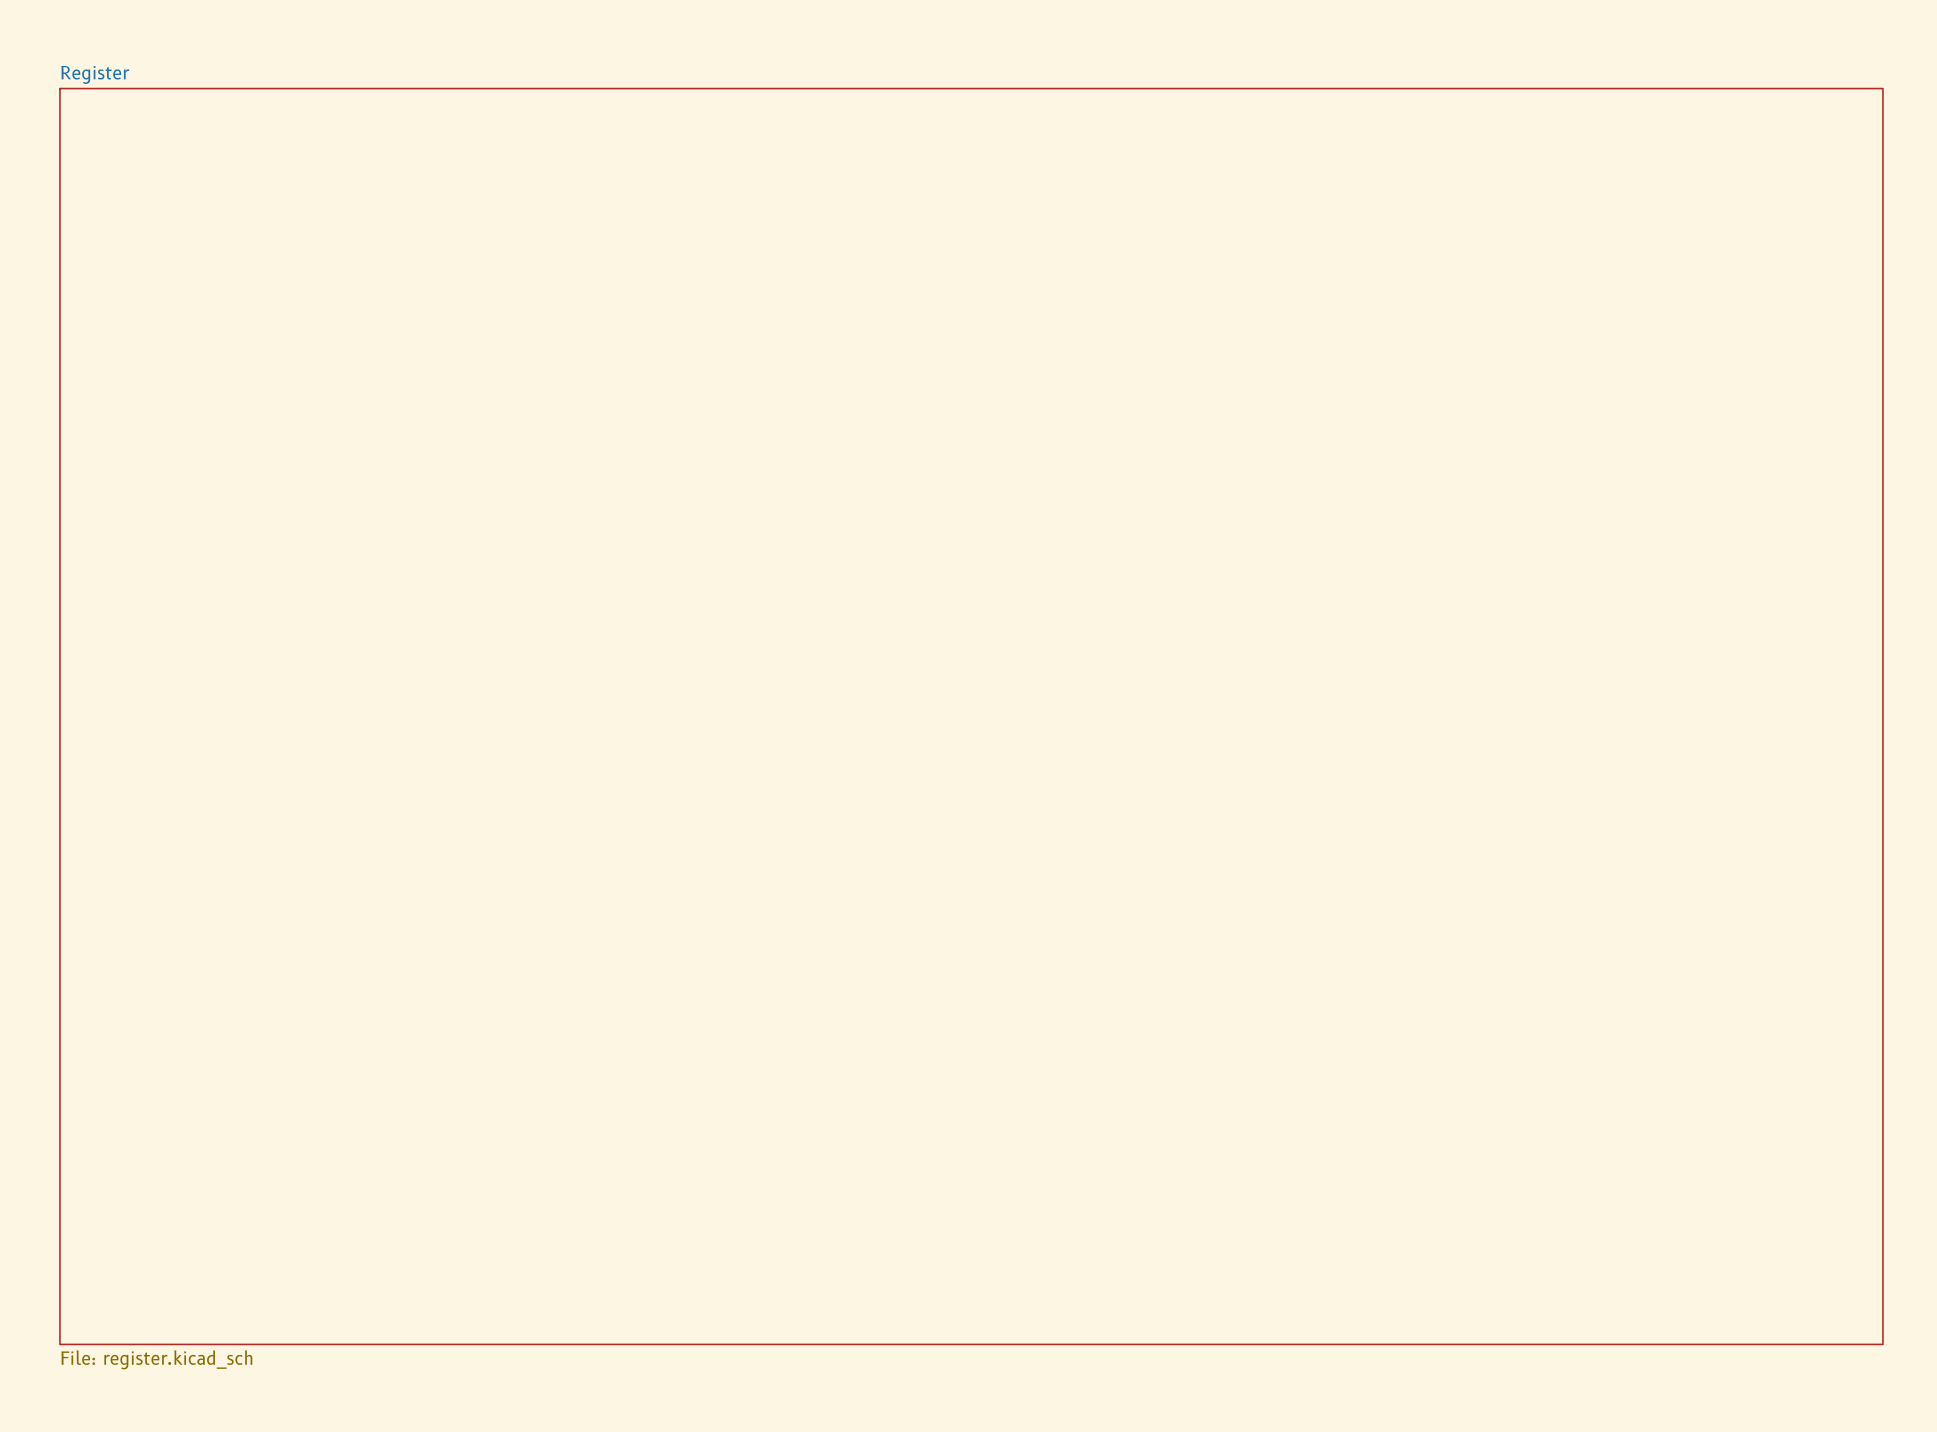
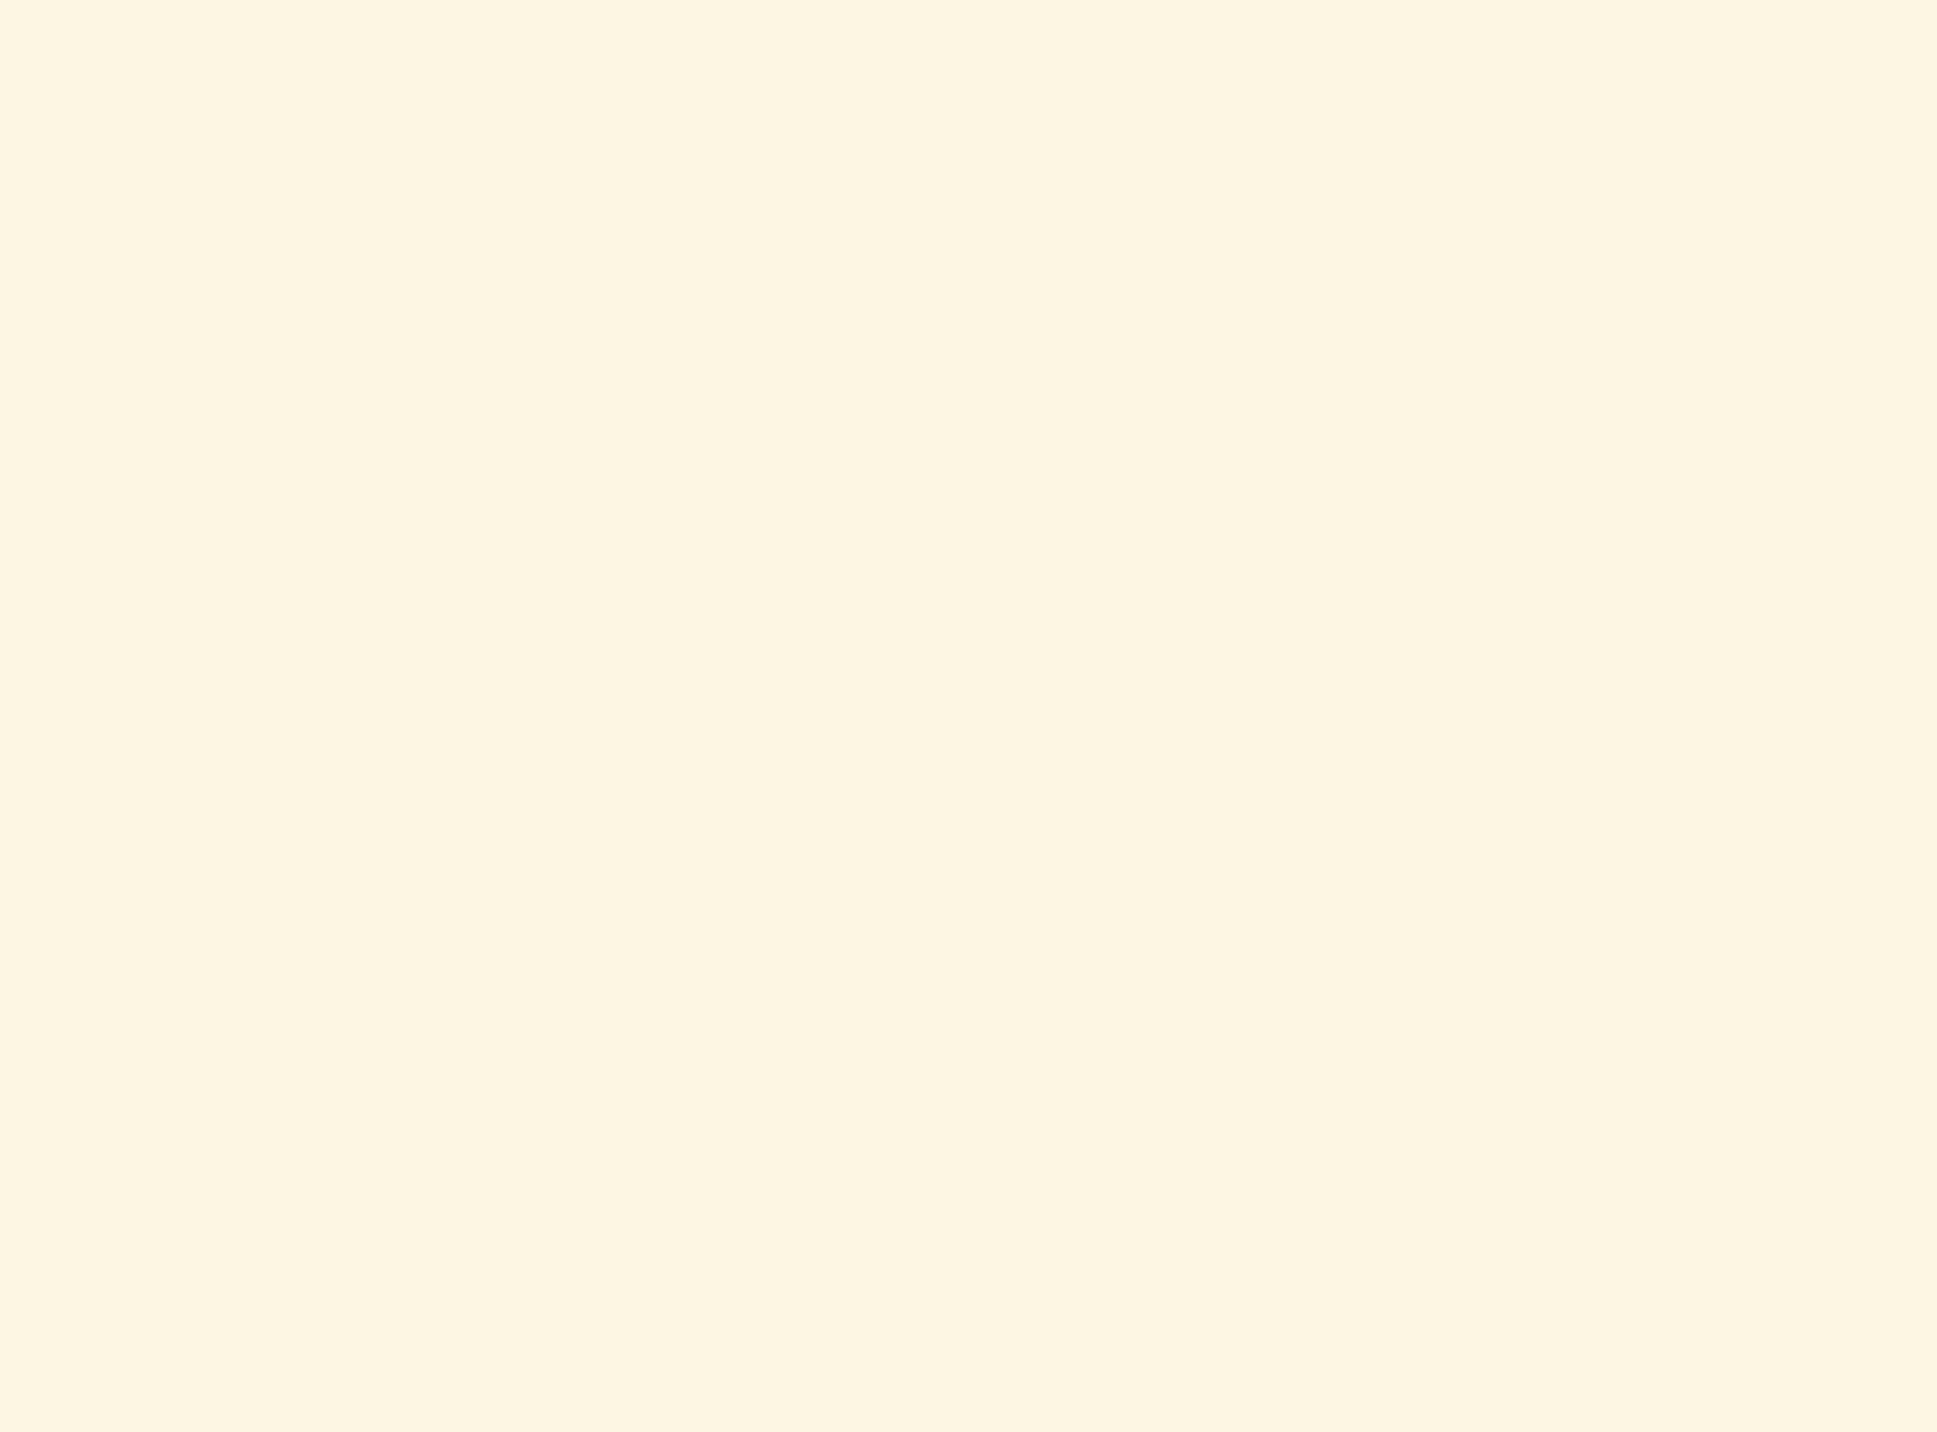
sheet Register: File: register.kicad_sch (971, 716) -> none

